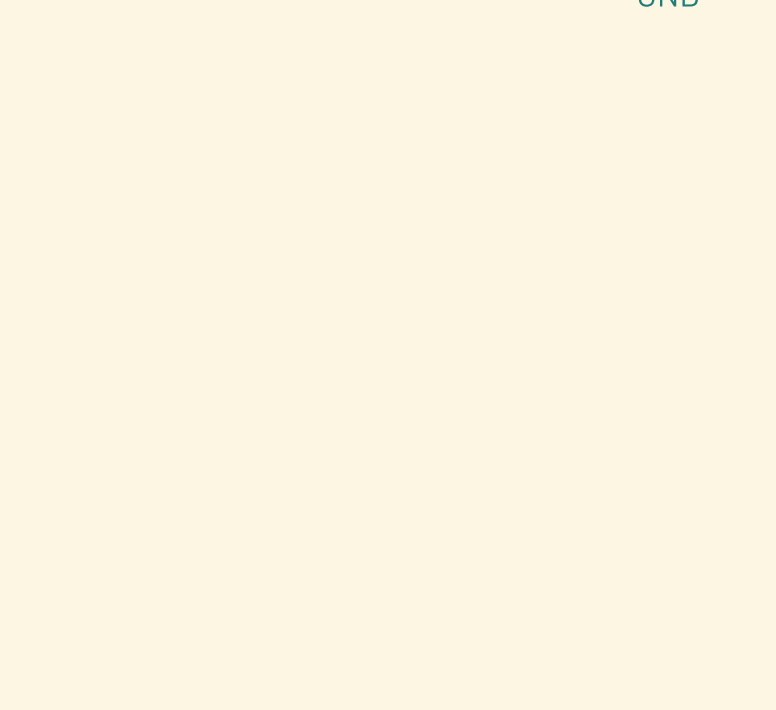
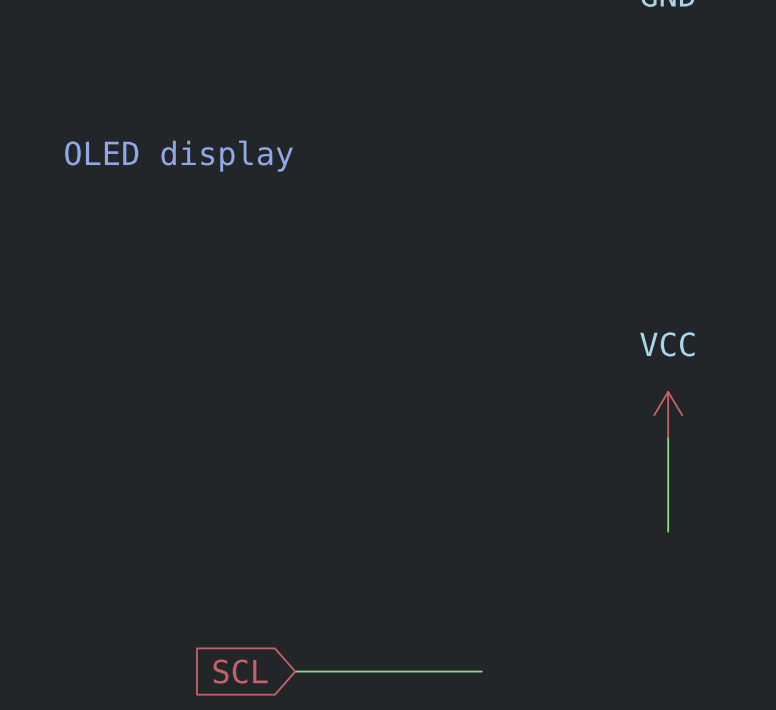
text: none -> OLED display (179, 156)
power symbol: none -> VCC (668, 415)
wire: none -> (668, 438) (668, 531)
global label: none -> SCL (240, 671)
wire: none -> (295, 671) (481, 671)

